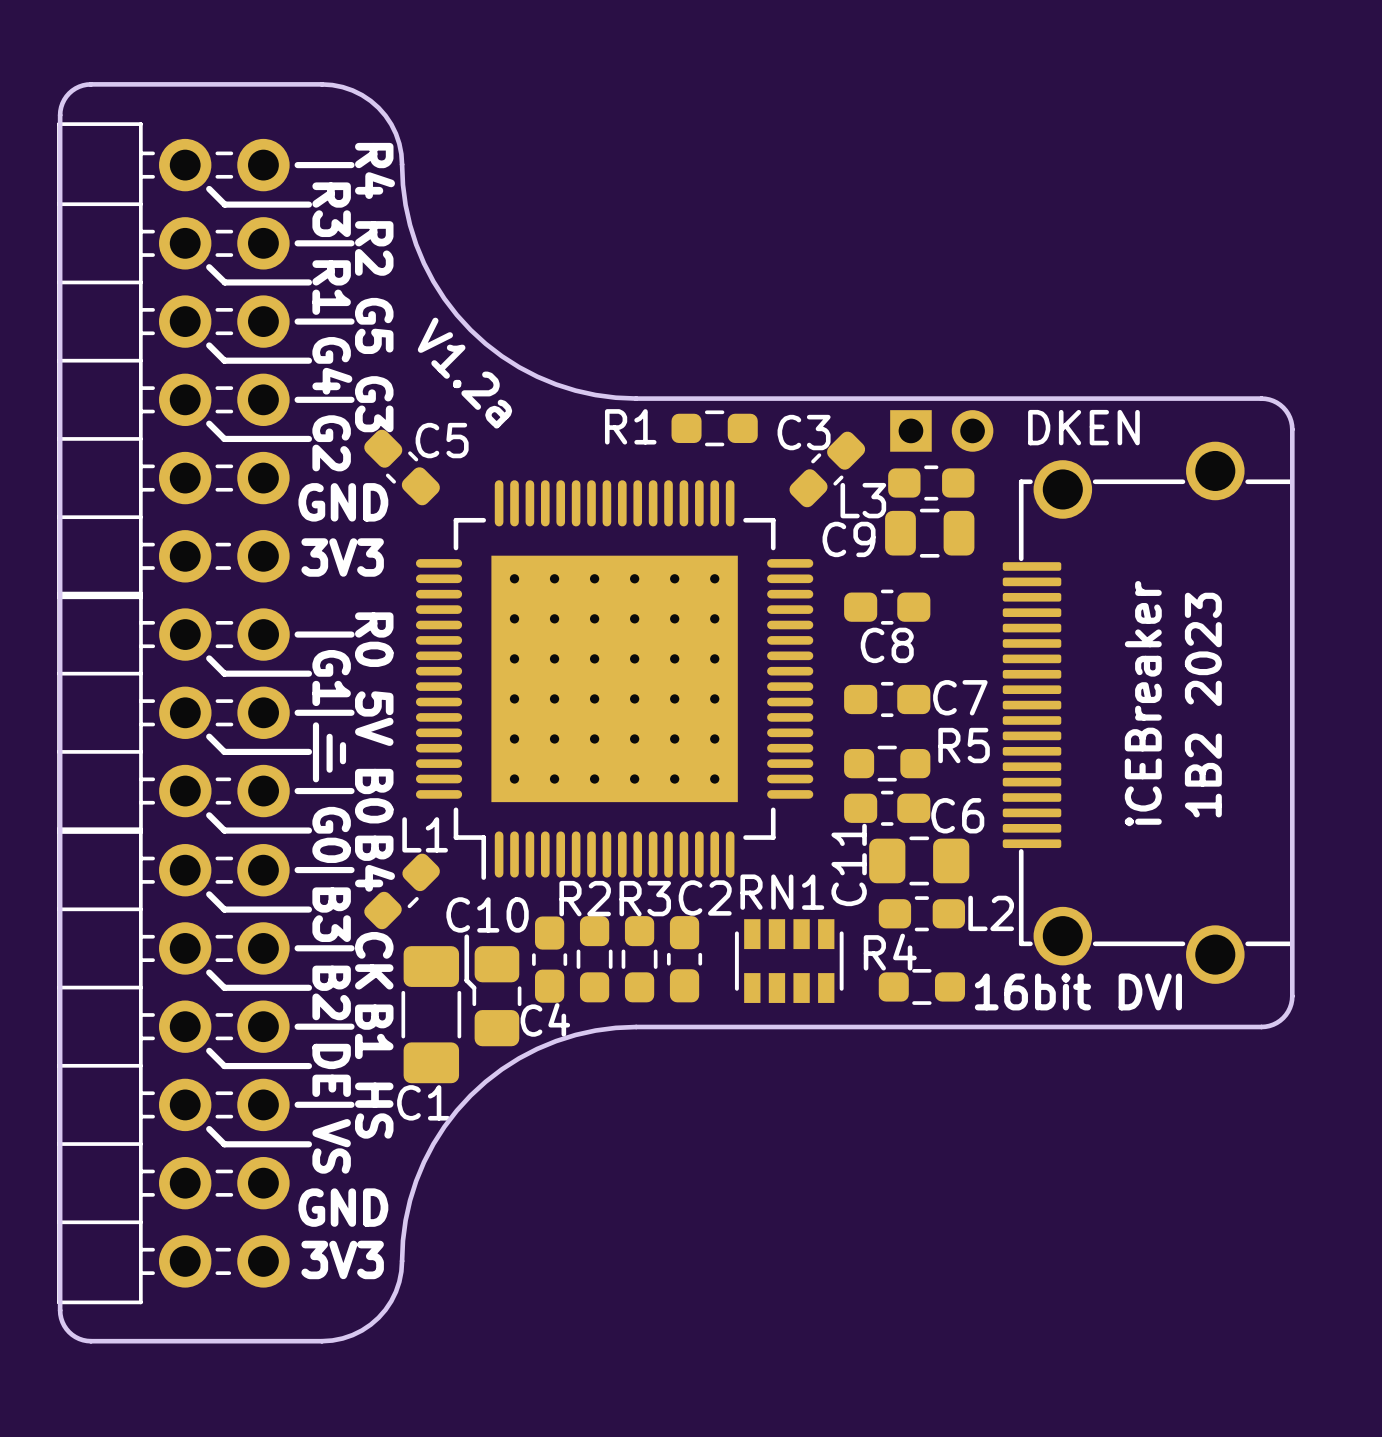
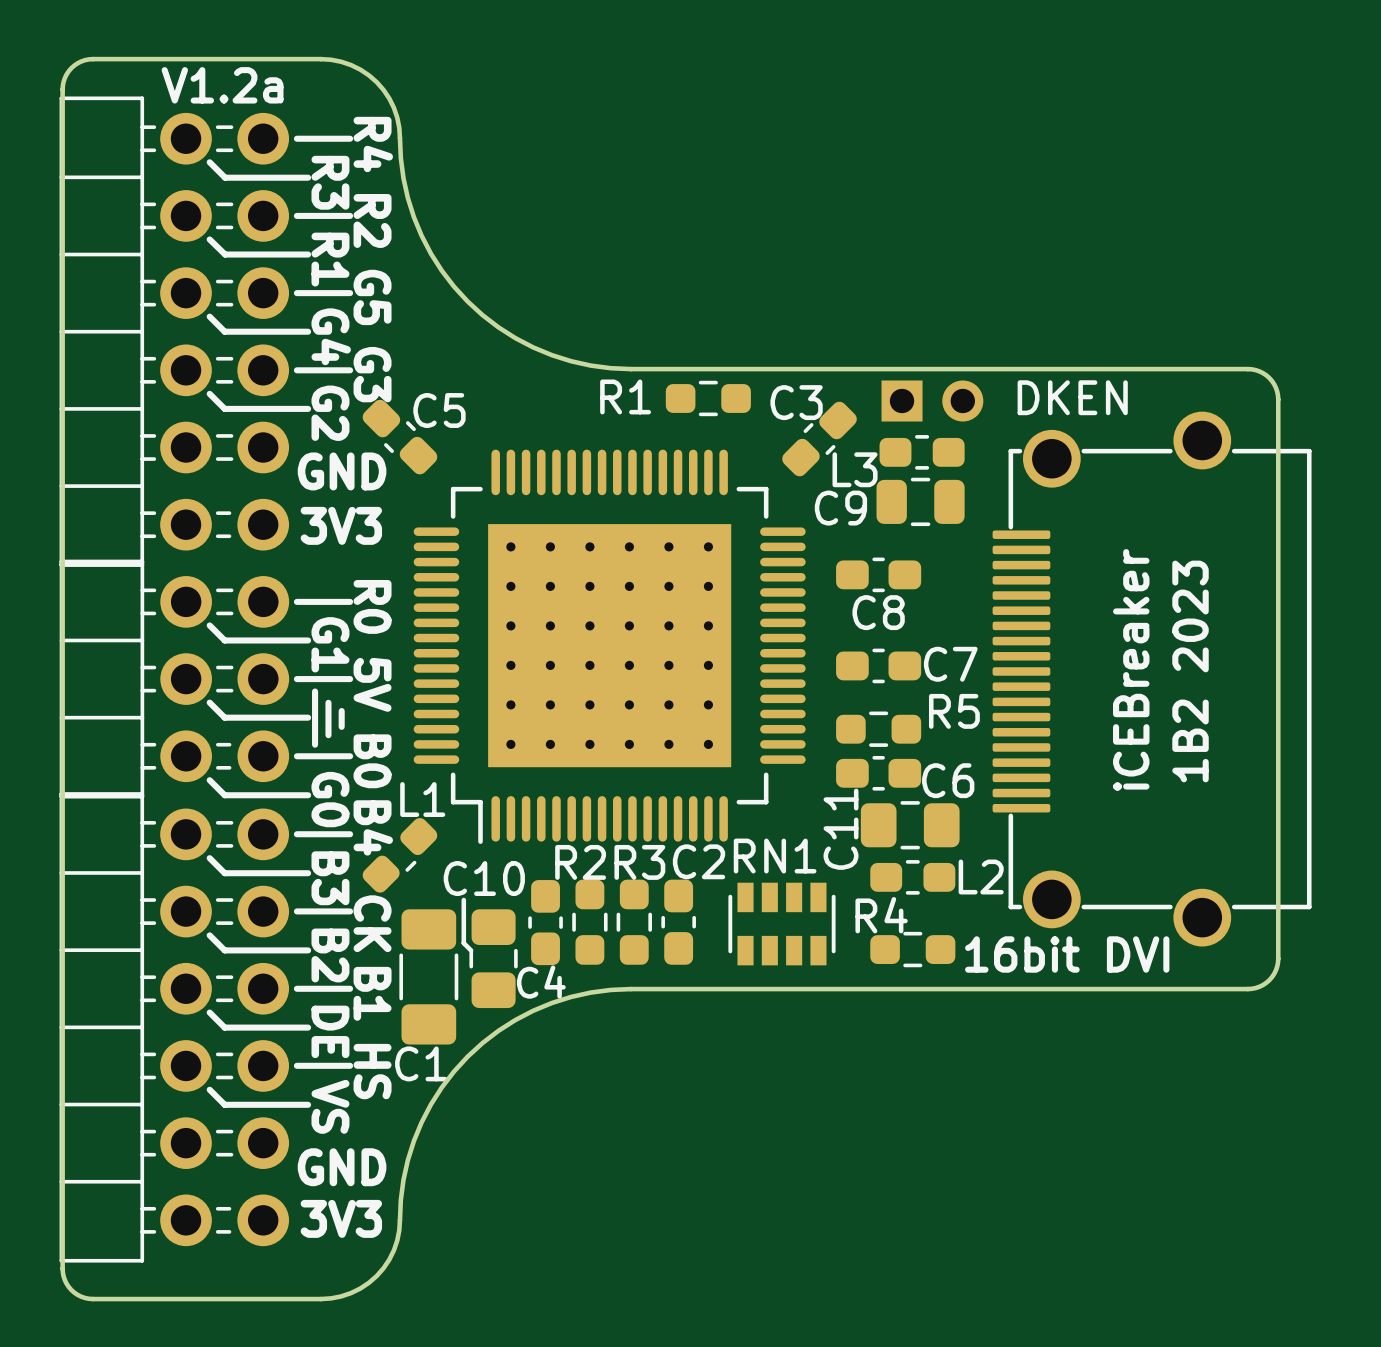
text rotation: 0° (464, 373) -> 45° counterclockwise (222, 85)
text position: V1.2a (464, 373) -> V1.2a (222, 85)
part footprint: [1002, 441, 1294, 984] -> [992, 411, 1312, 947]

